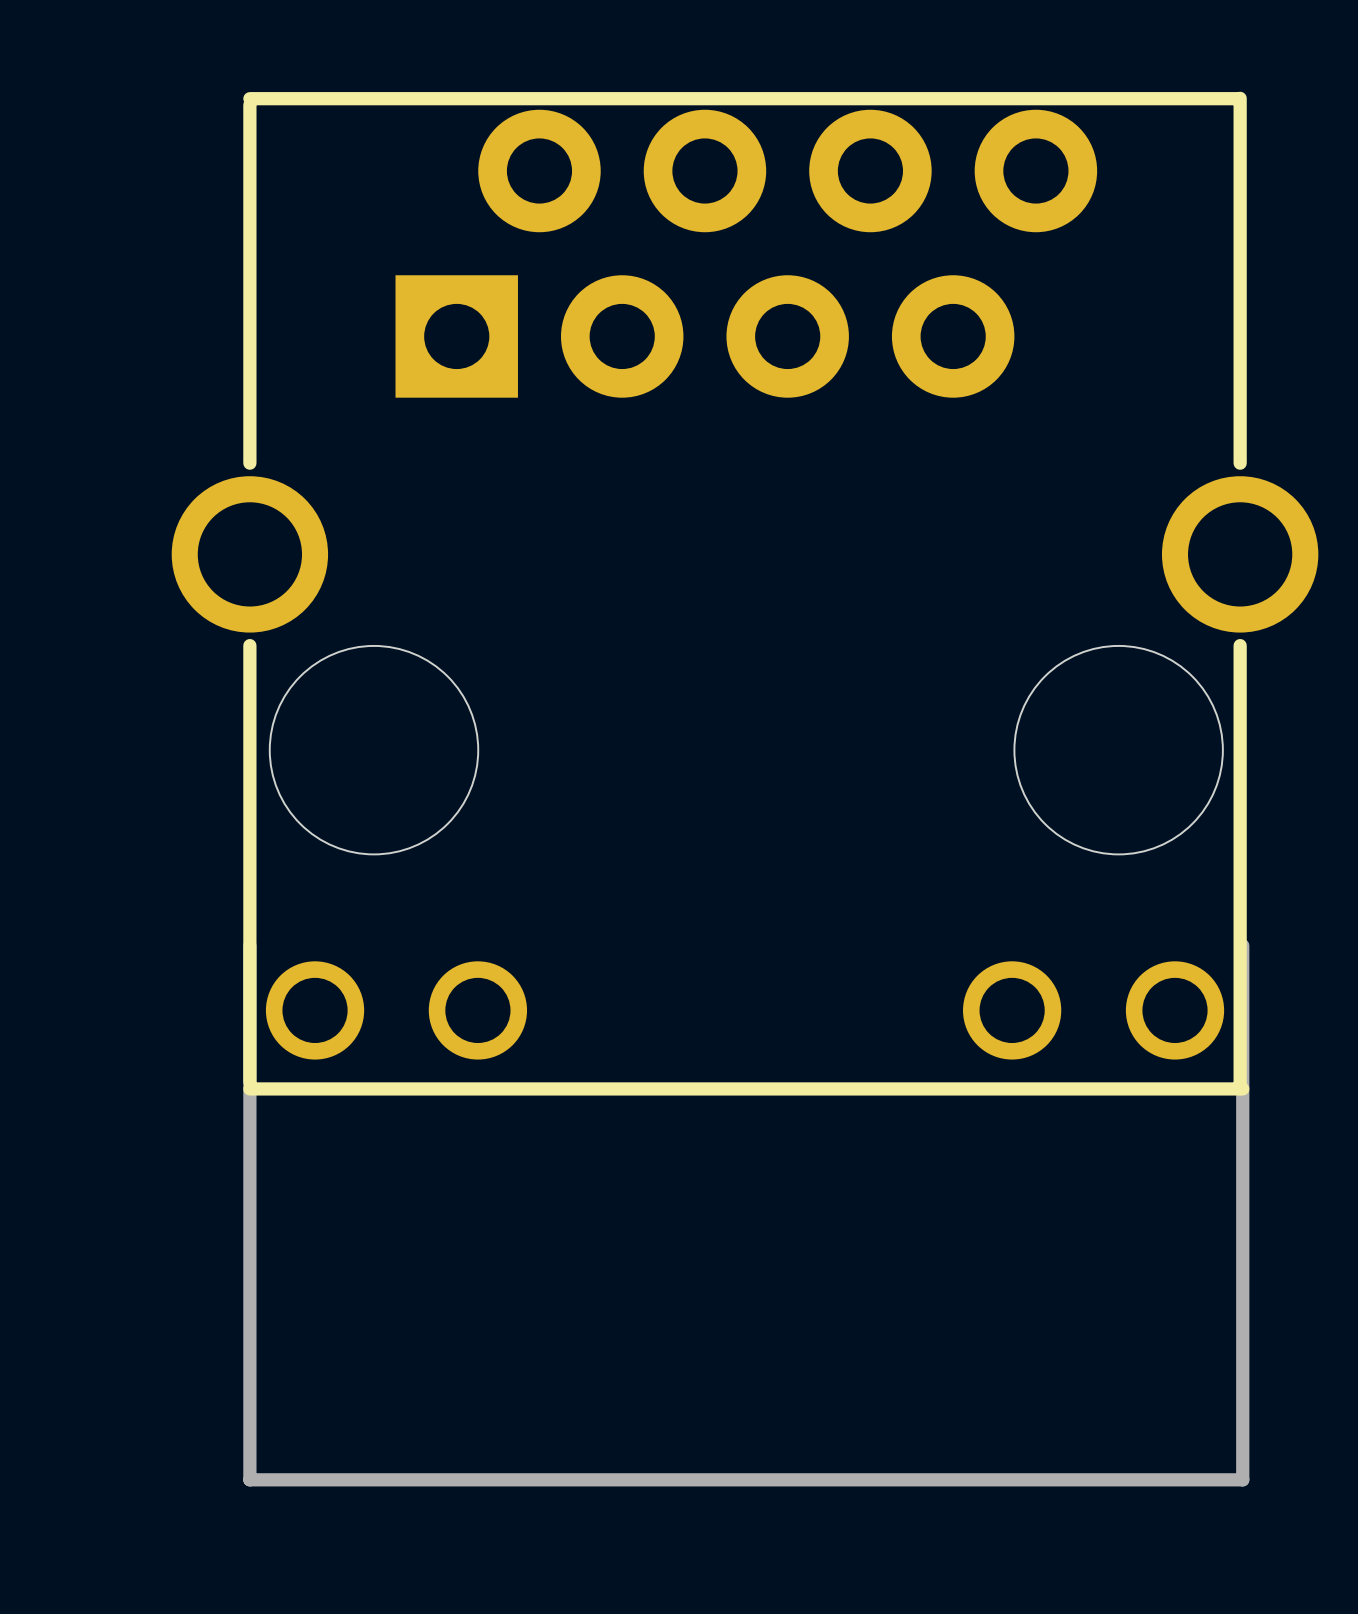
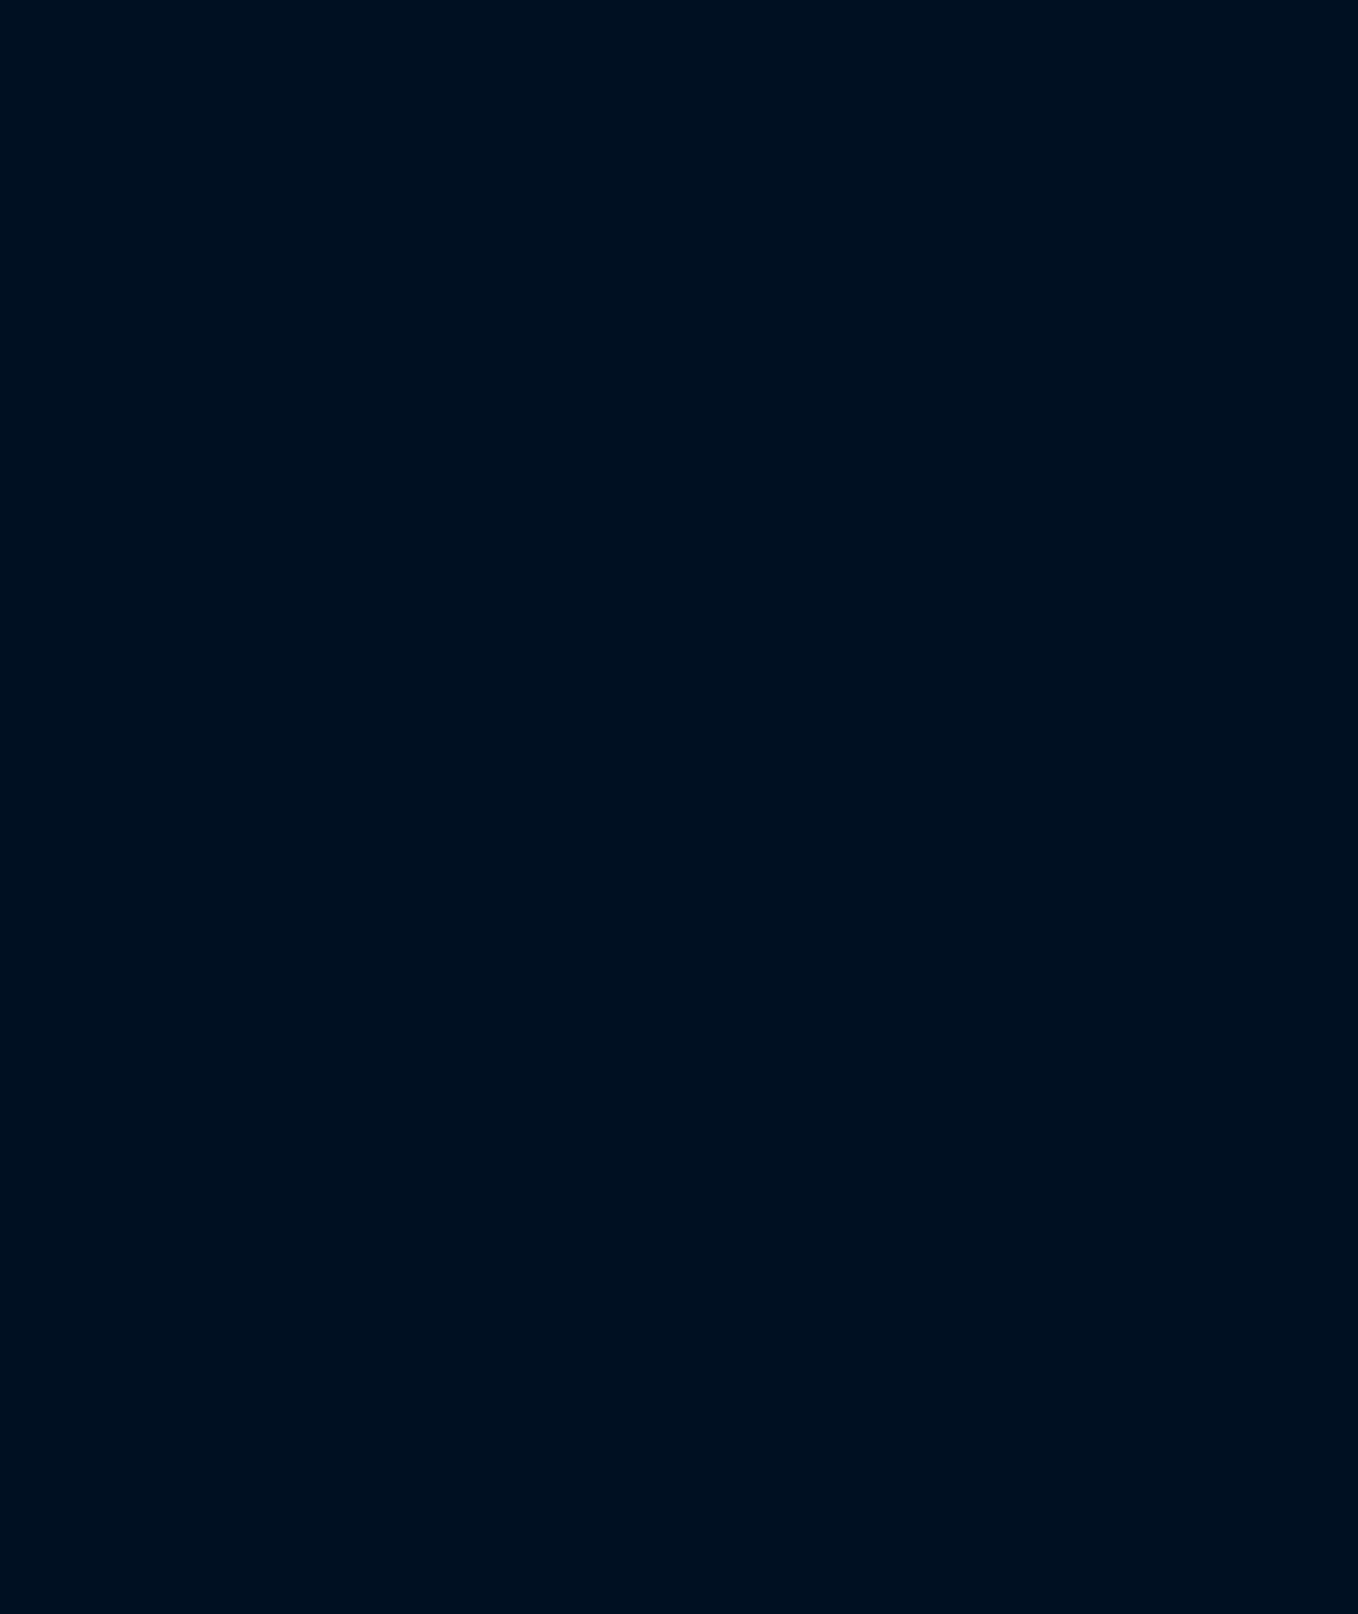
part: (745, 789) -> none

